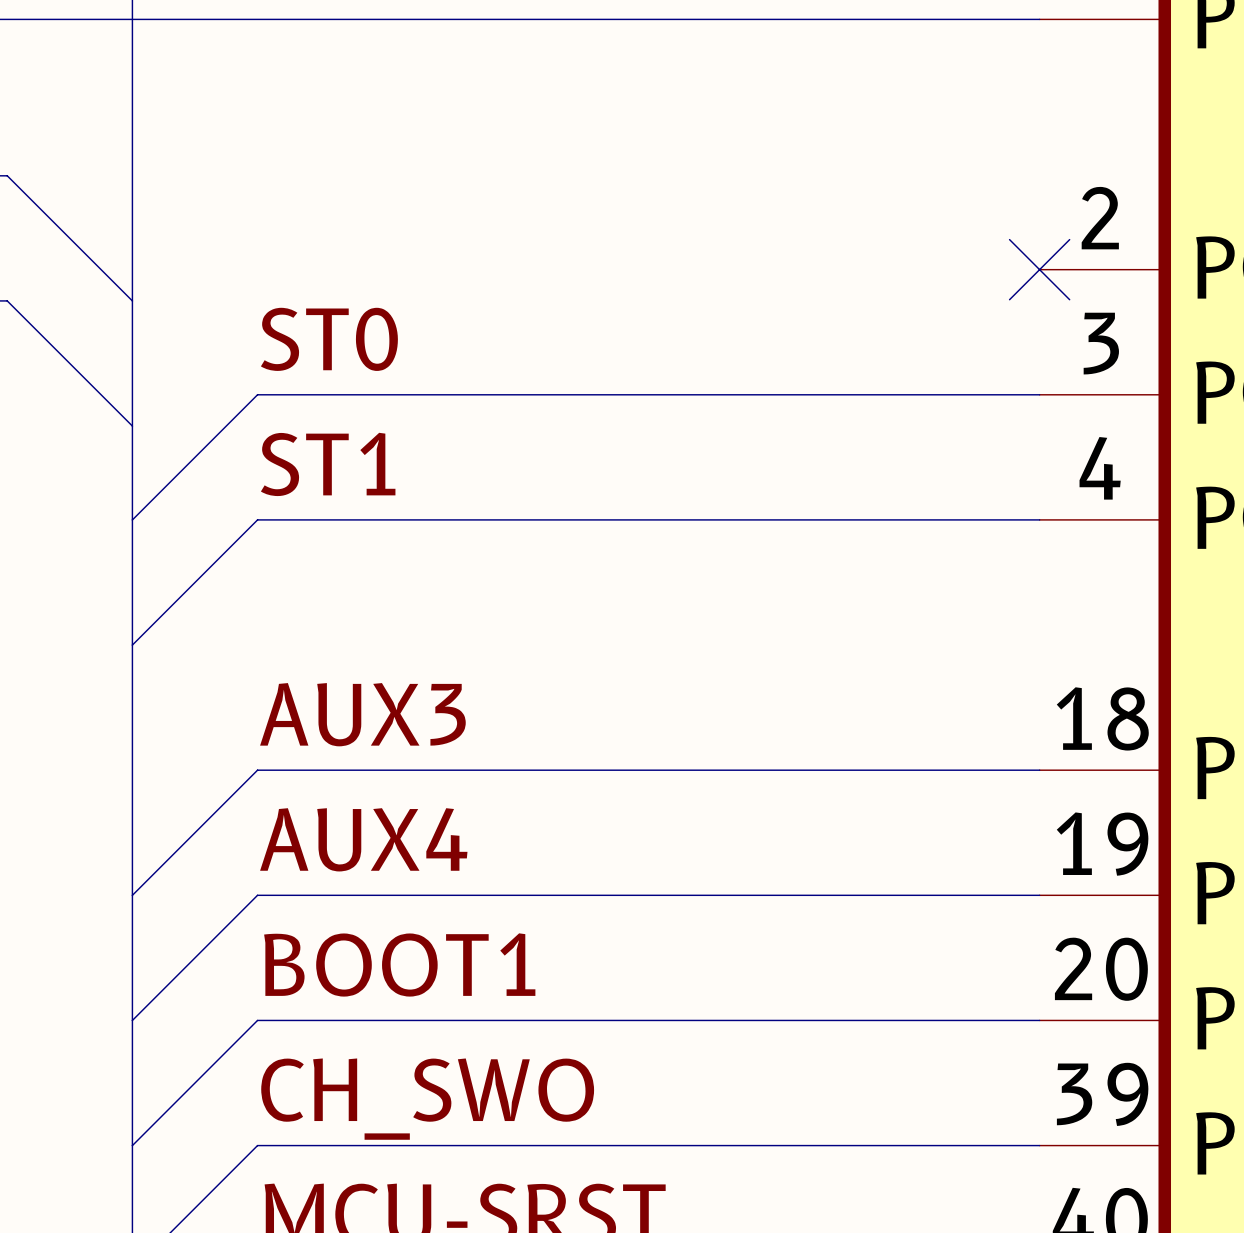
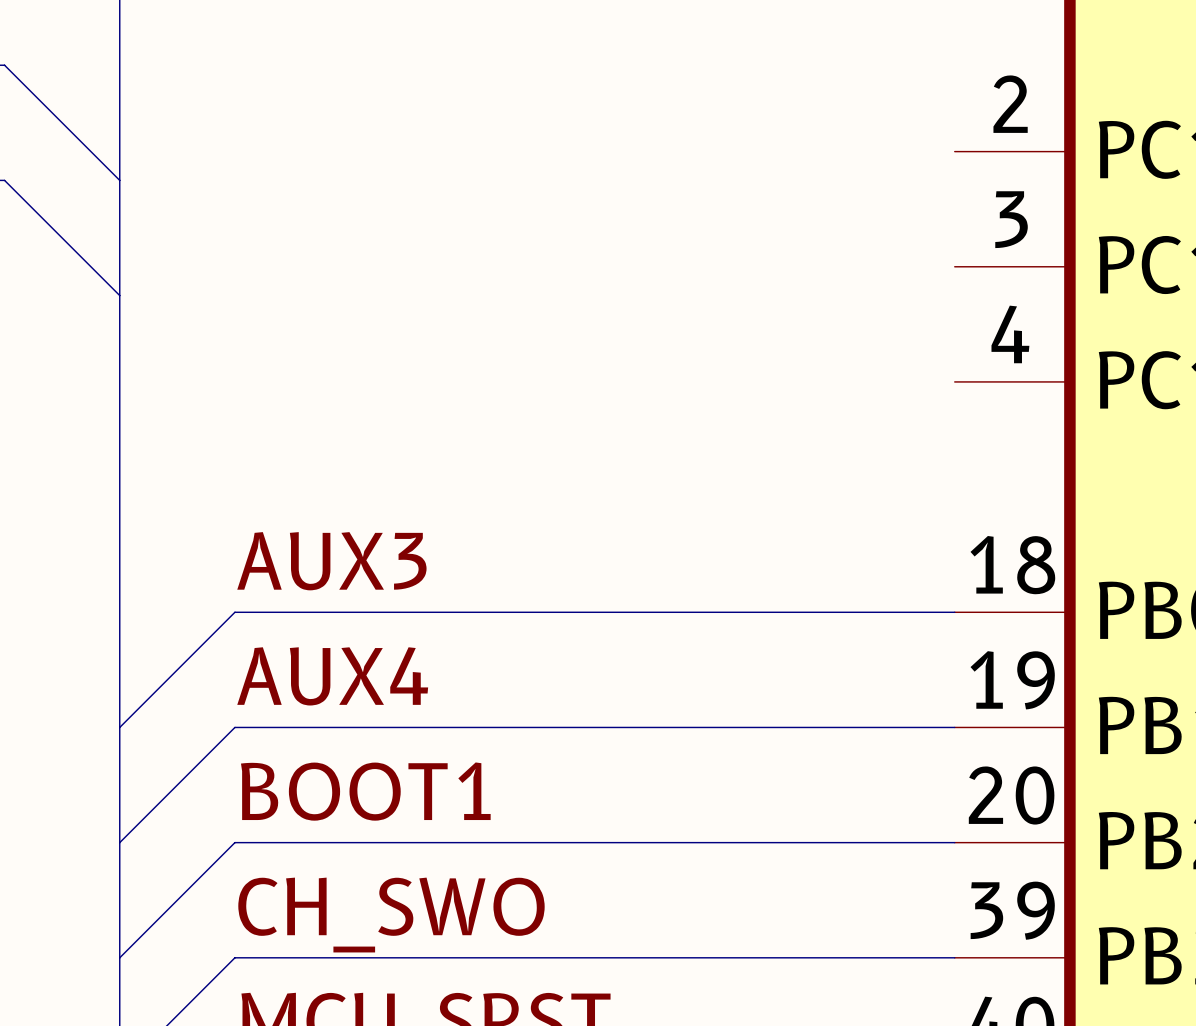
no-connect mark: (1039, 269) -> none
label: ST0 (329, 339) -> none
wire: (1039, 394) (257, 394) (132, 519) -> none
label: ST1 (328, 464) -> none
wire: (1039, 519) (257, 519) (132, 645) -> none

